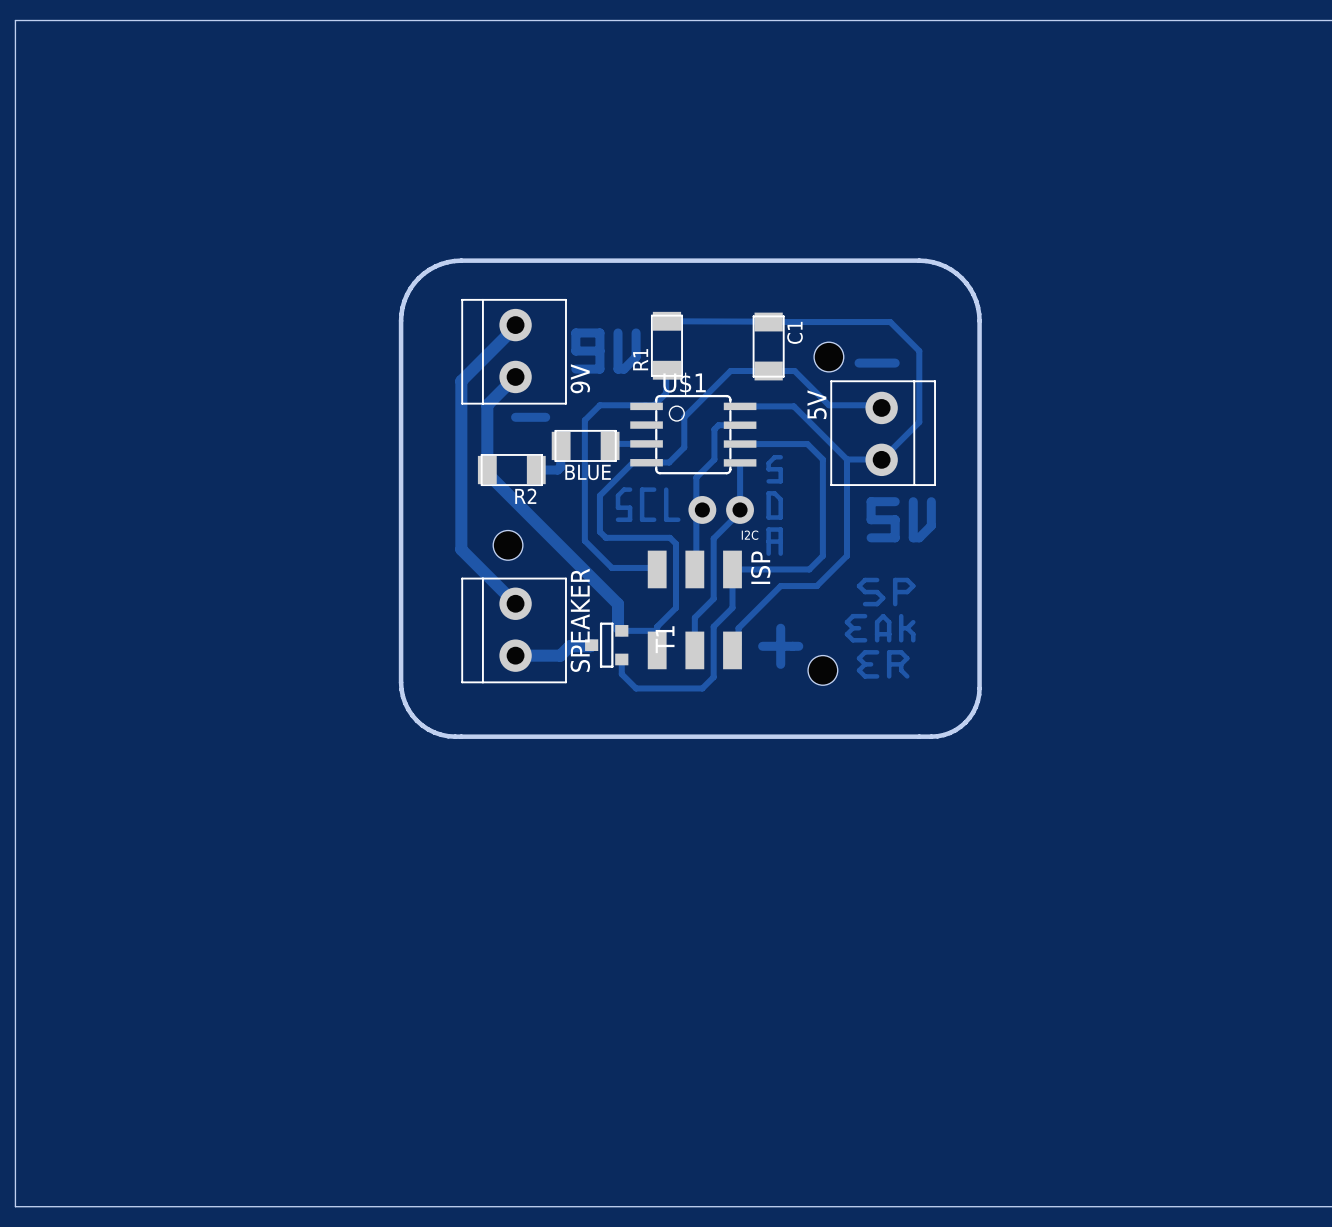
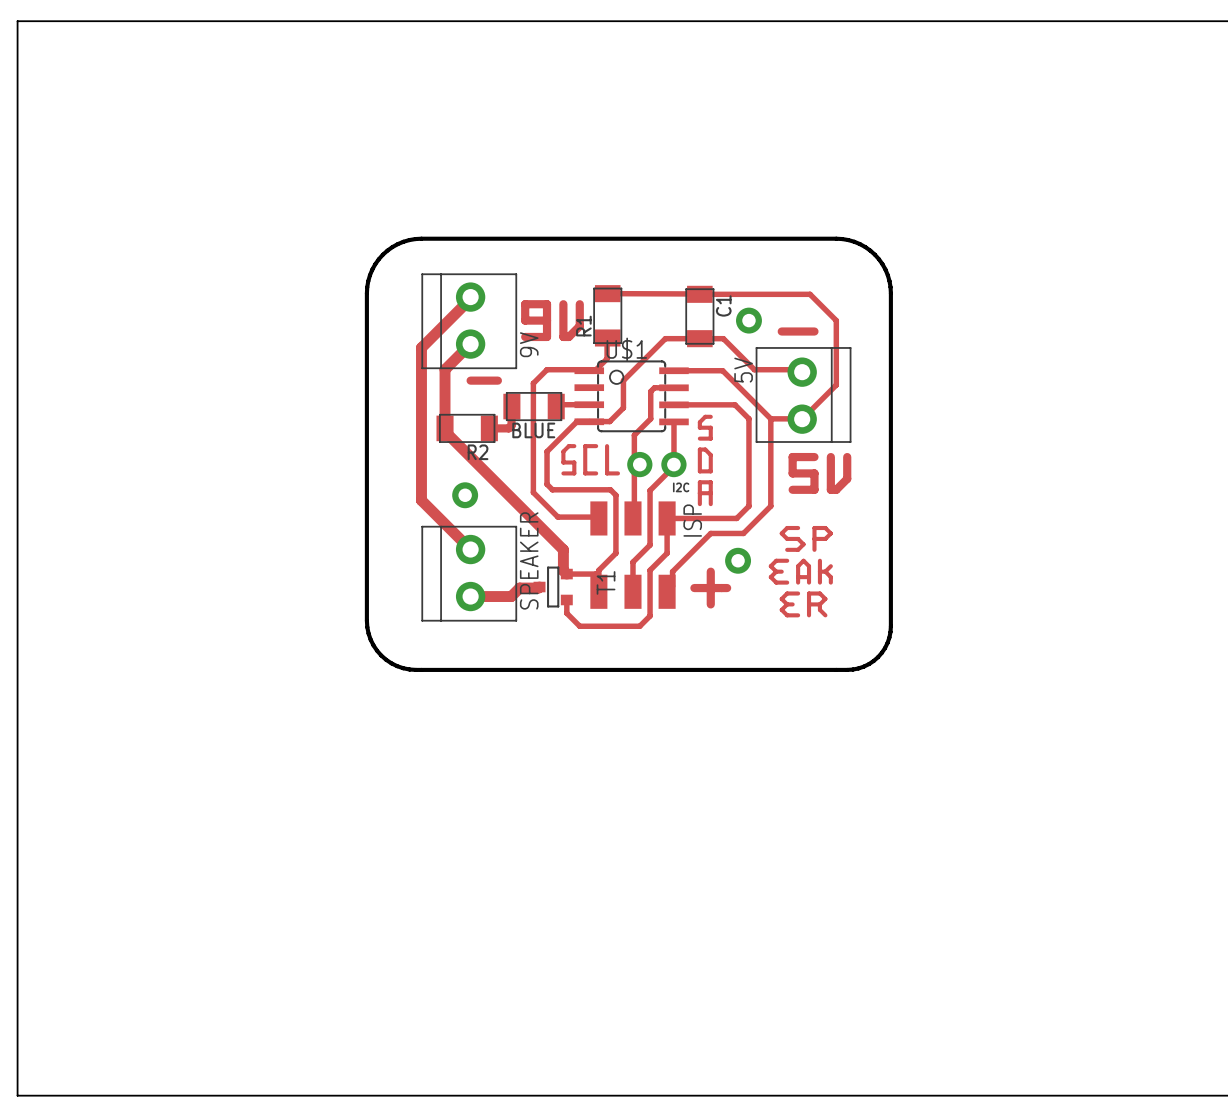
via: none -> (748, 320)
hole: (828, 357) -> none
via: none -> (465, 495)
hole: (508, 545) -> none
via: none -> (738, 560)
hole: (822, 670) -> none

